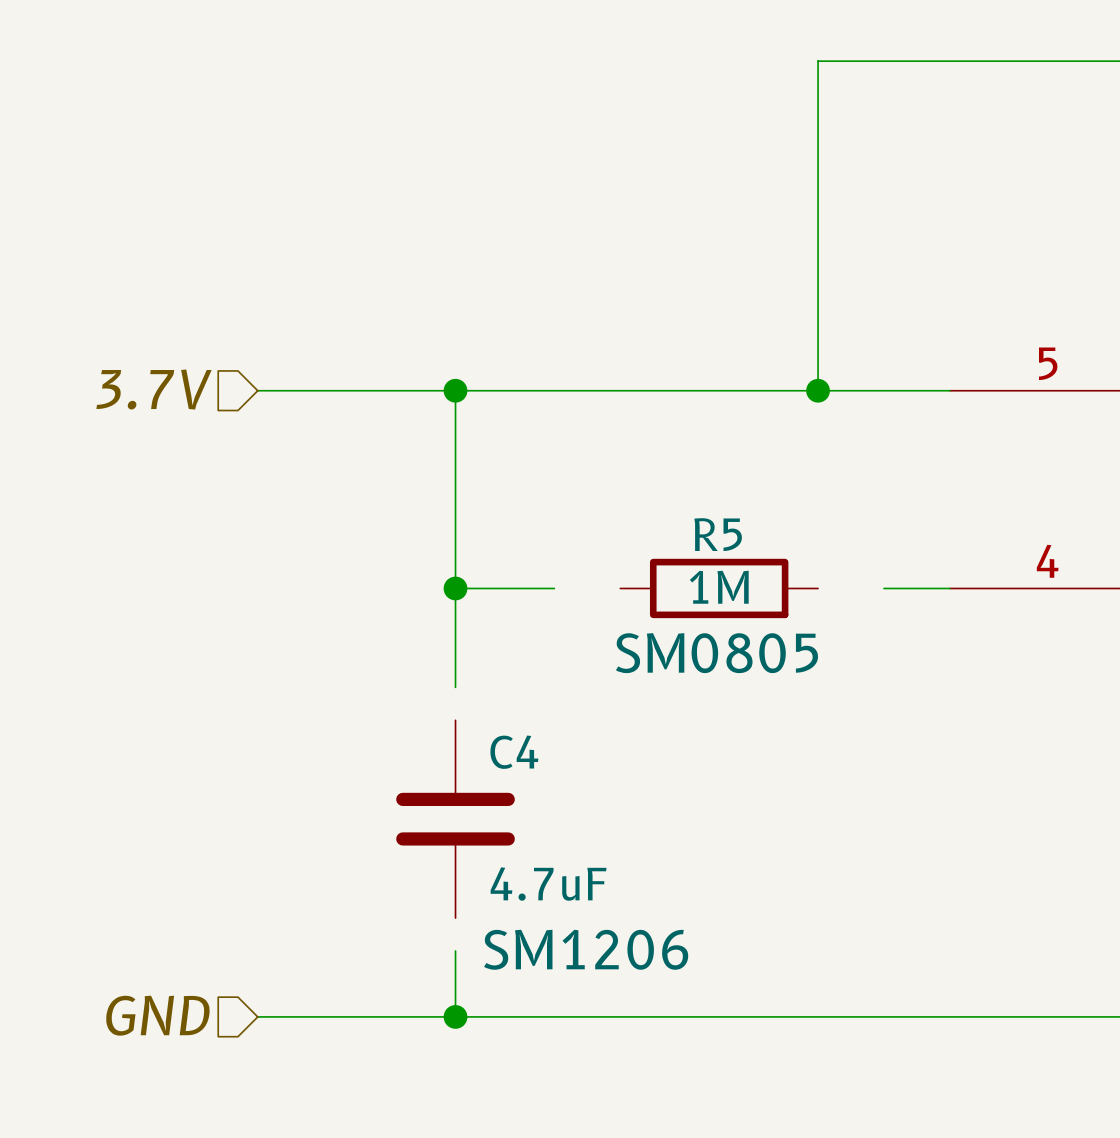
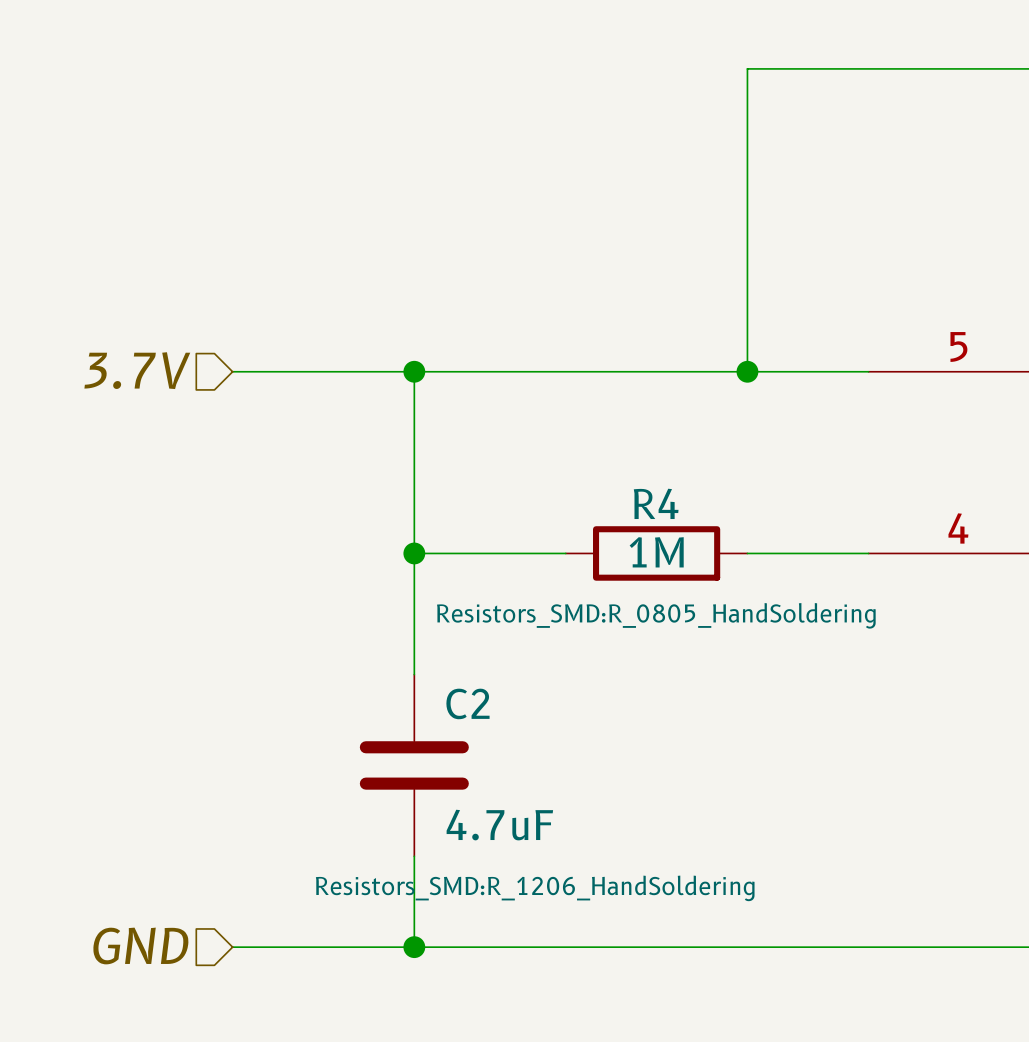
R5 name: R5 (718, 534) -> R4 (656, 503)
wire: none -> (505, 553) (565, 553)
wire: none -> (747, 553) (808, 553)
R5 text: SM0805 (716, 653) -> Resistors_SMD:R_0805_HandSoldering (656, 615)
wire: none -> (414, 644) (414, 674)
C4 name: C4 (514, 752) -> C2 (467, 703)
wire: none -> (414, 856) (414, 886)
C4 text: SM1206 (586, 949) -> Resistors_SMD:R_1206_HandSoldering (535, 888)

